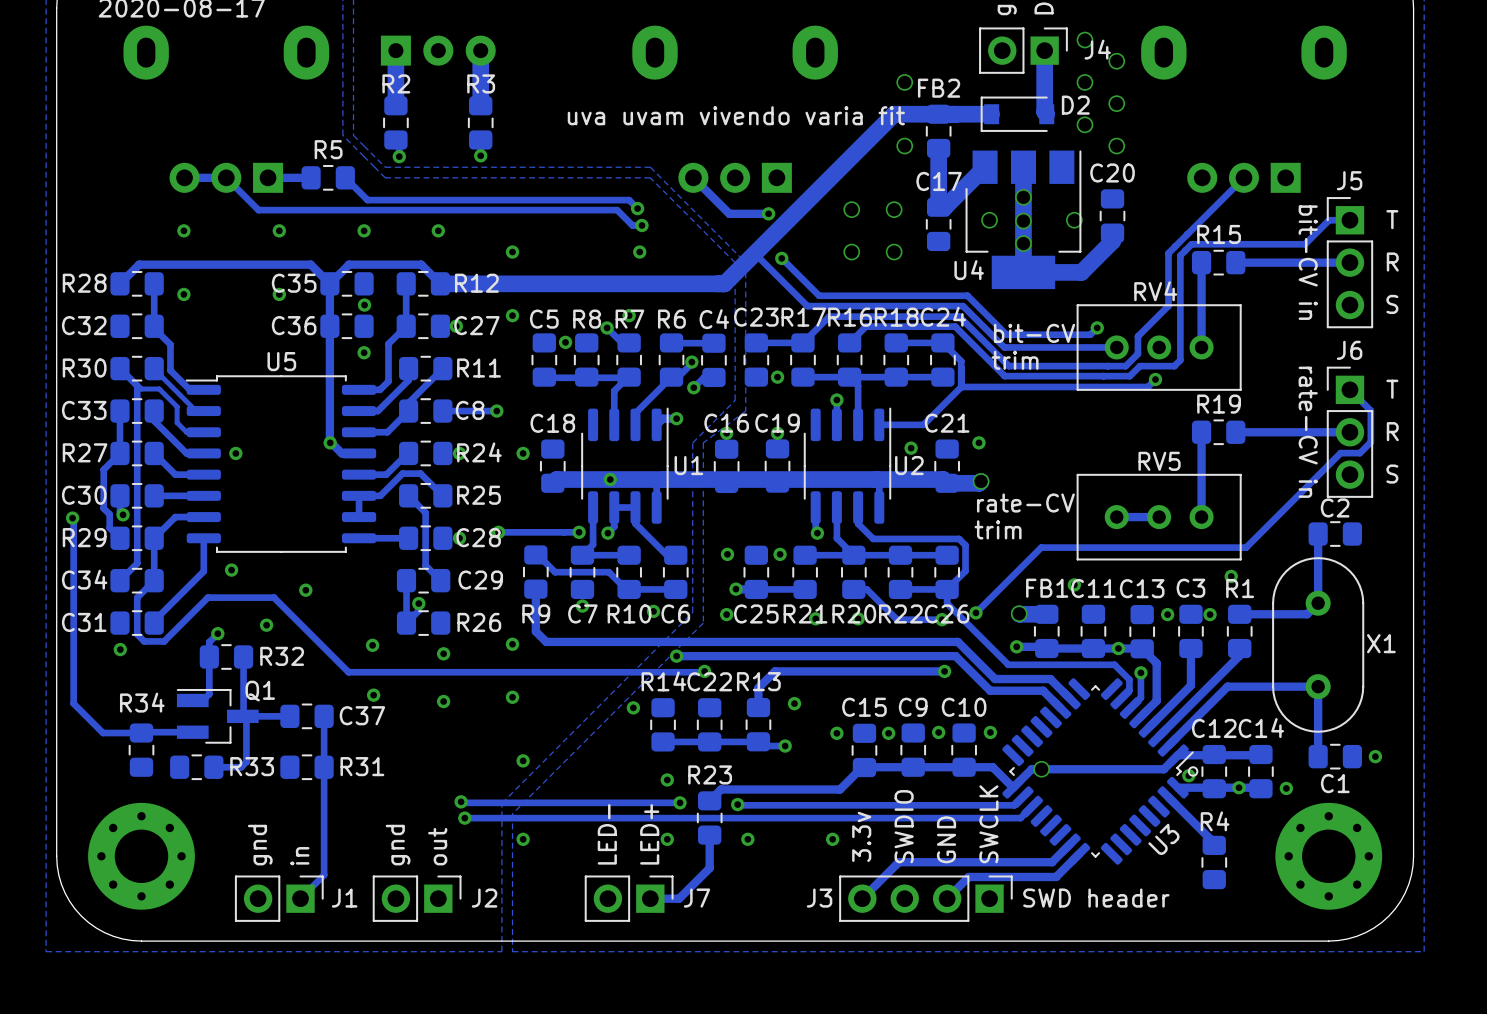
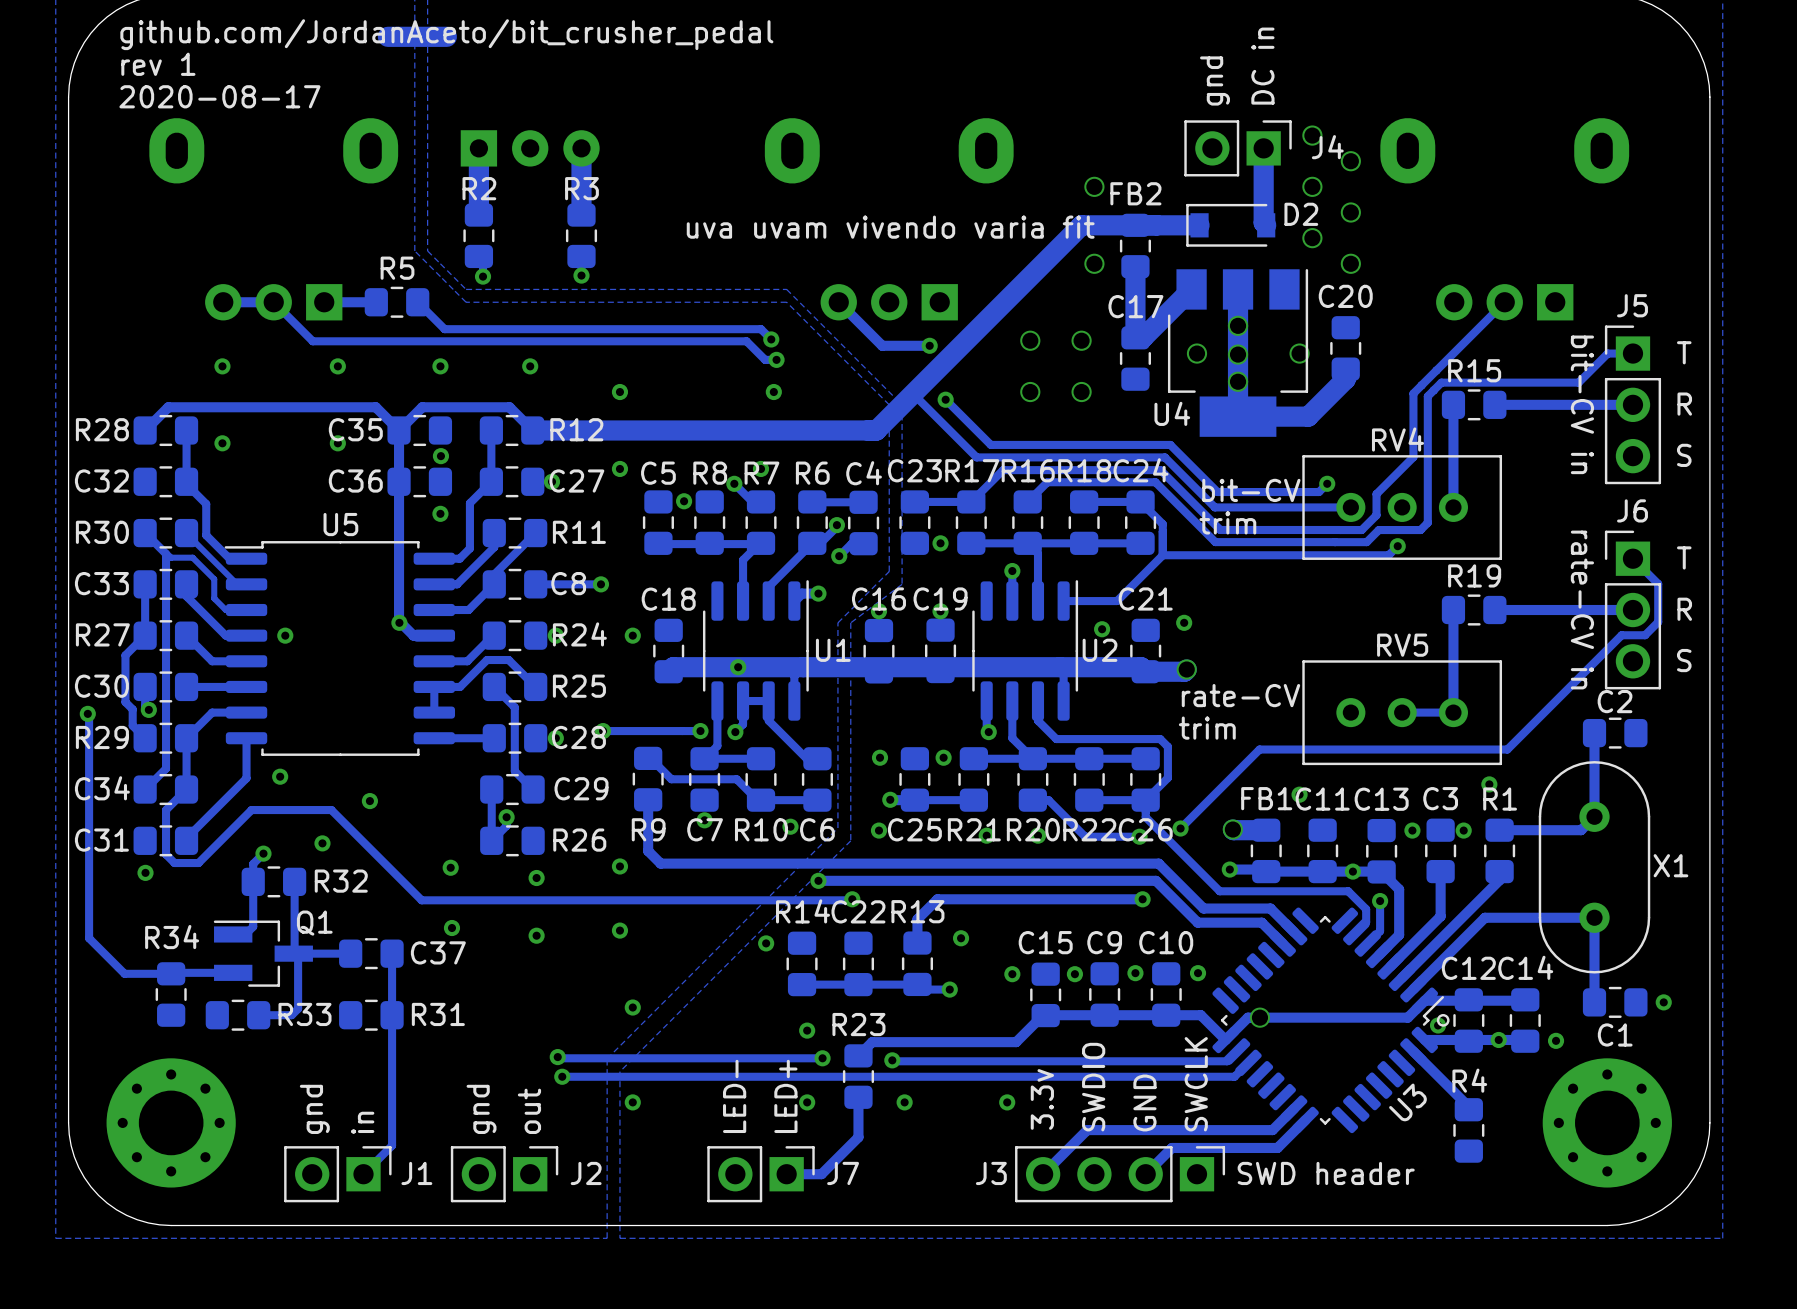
track: (1159, 517) (1116, 517) -> (1402, 712) (1453, 712)

